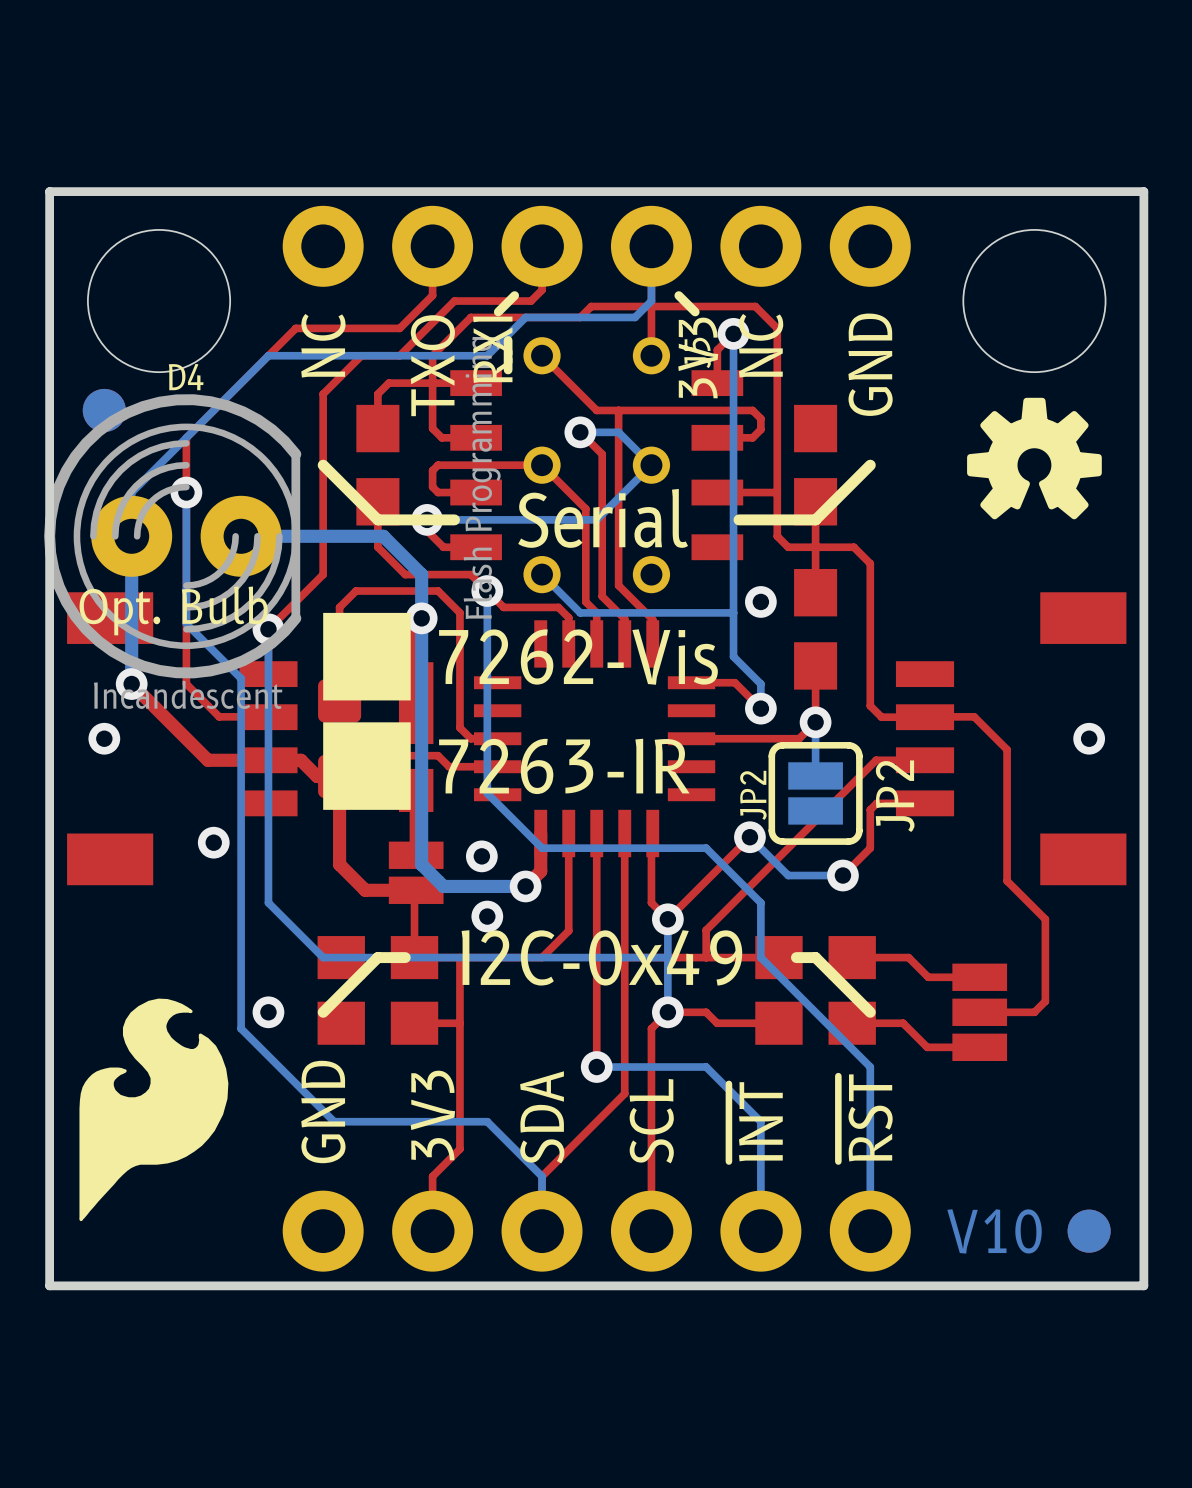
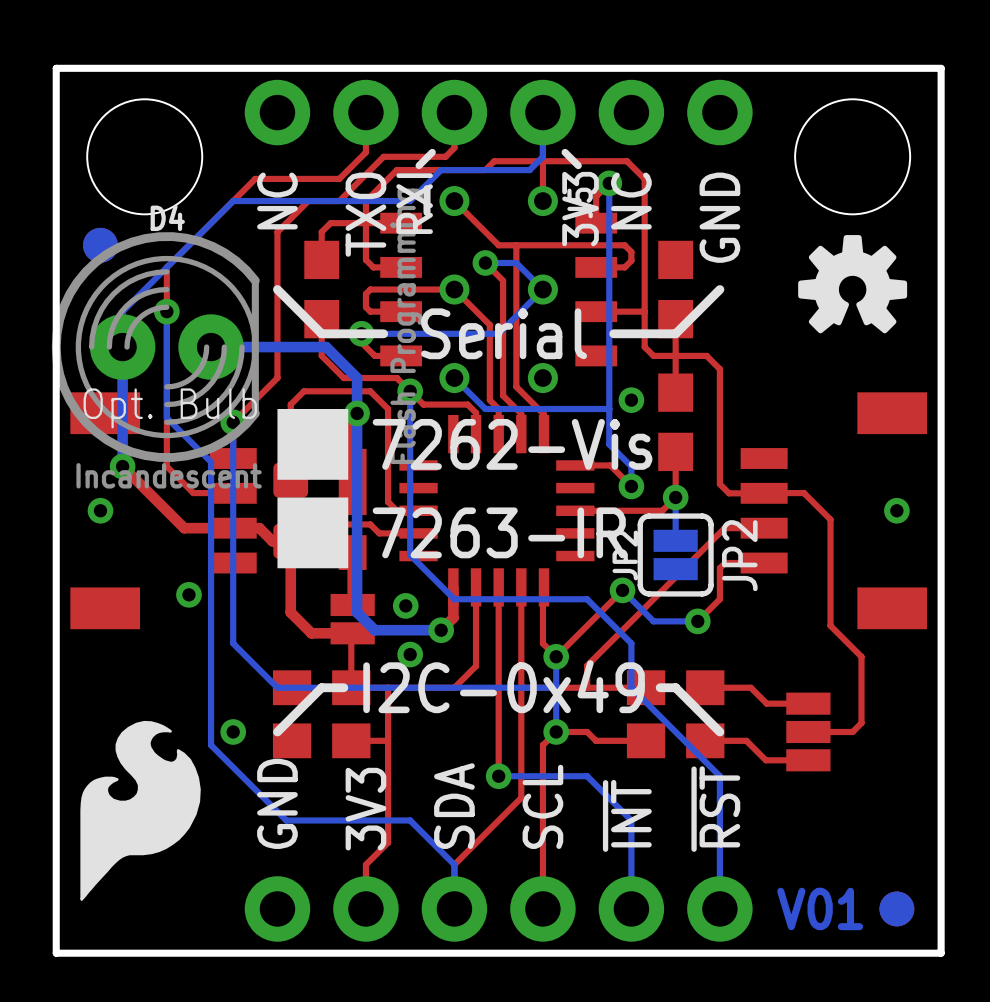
text: V10 (994, 1231) -> V01 (820, 908)

